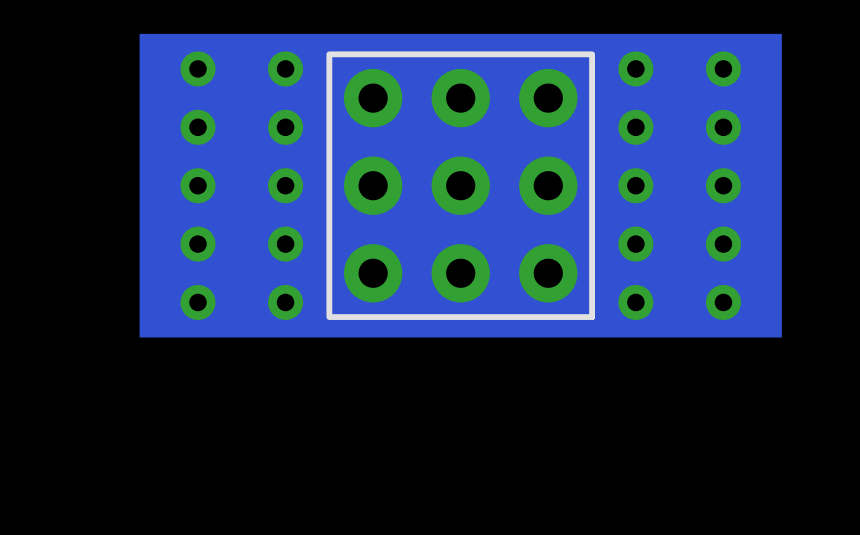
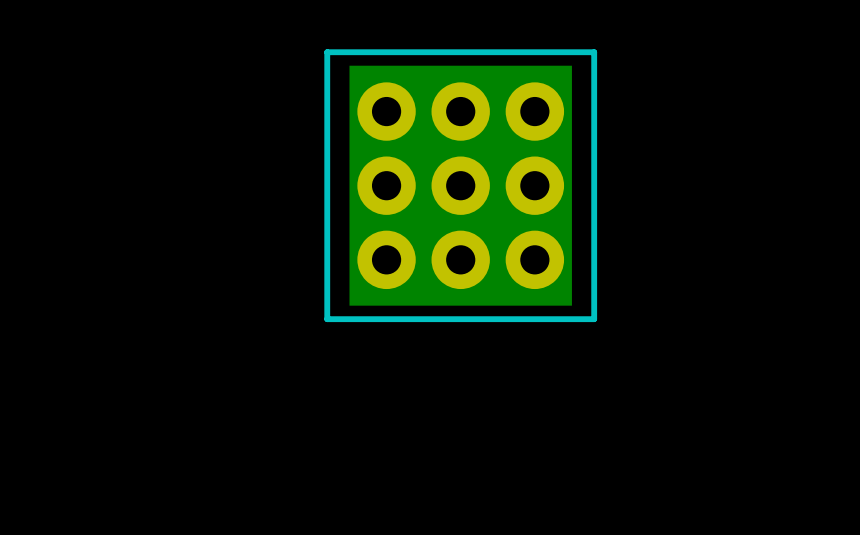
part footprint: [139, 33, 782, 338] -> [324, 49, 598, 323]

